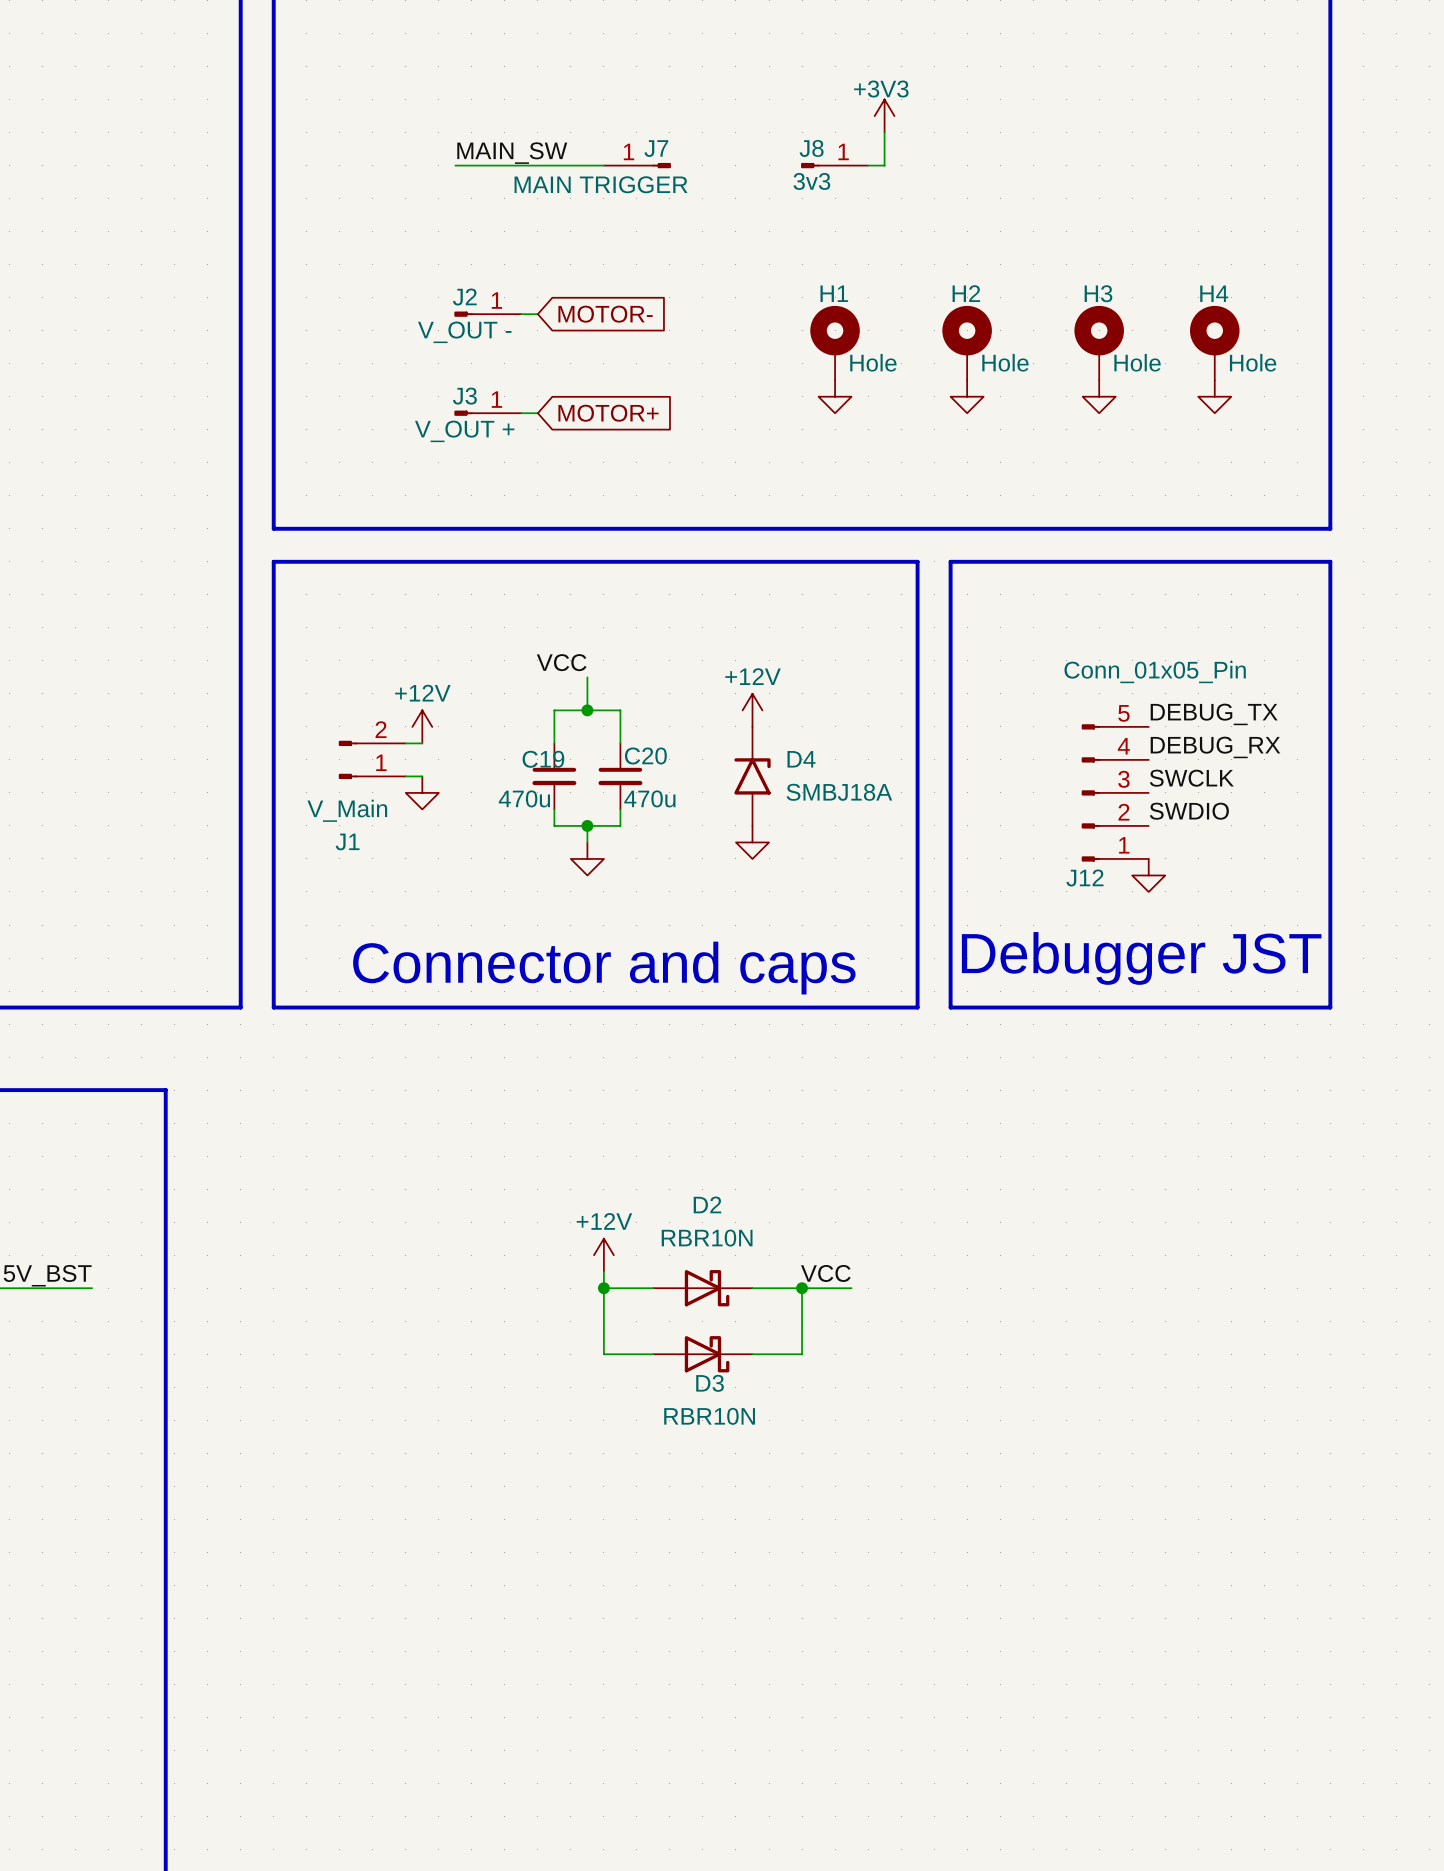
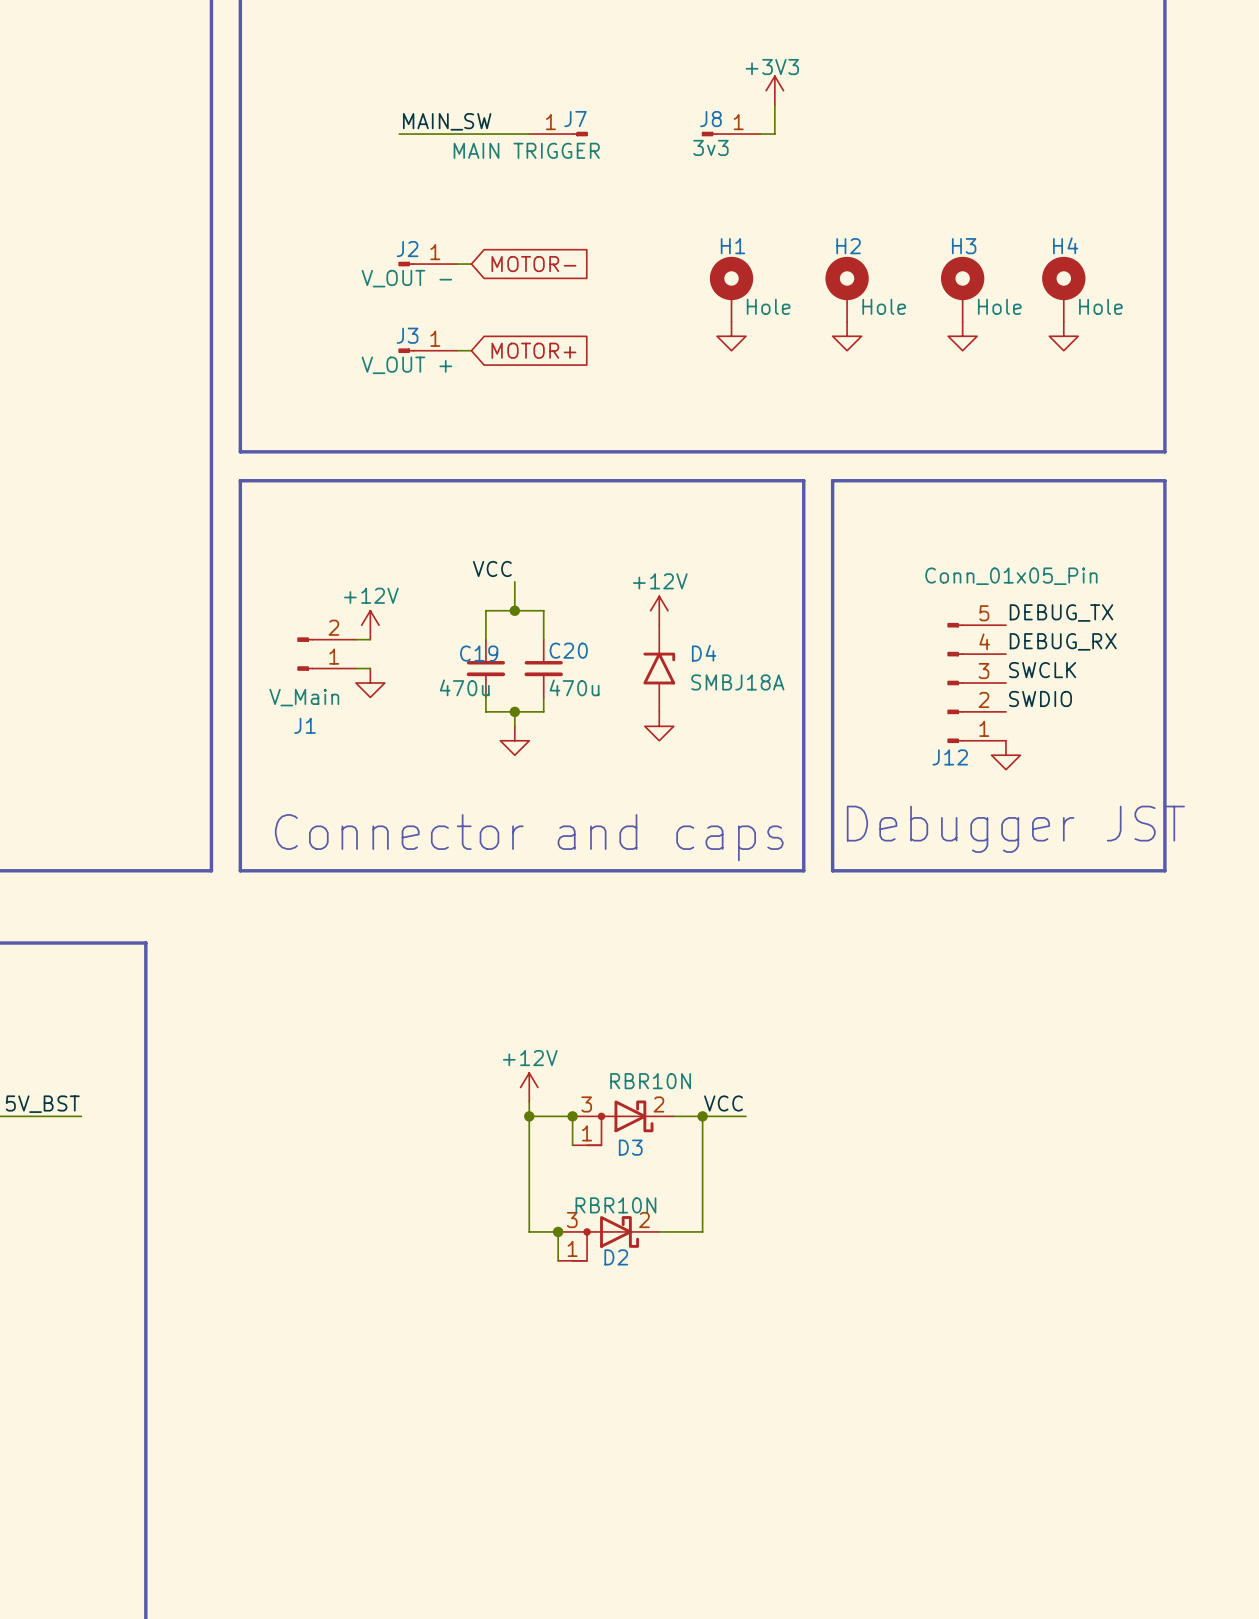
D2 name position: D2 (707, 1204) -> D2 (616, 1257)
D2 symbol: [653, 1270, 753, 1307] -> [558, 1216, 660, 1261]
wire: none -> (572, 1116) (572, 1145)
junction: none -> (572, 1116)
D3 symbol: [653, 1336, 753, 1373] -> [572, 1100, 674, 1146]
wire: (603, 1354) (653, 1354) -> (529, 1174) (529, 1231) (558, 1231) (558, 1260)
wire: (752, 1354) (802, 1354) -> (659, 1231) (702, 1231) (702, 1174)
D3 value position: RBR10N (709, 1416) -> RBR10N (650, 1081)
junction: none -> (558, 1231)

